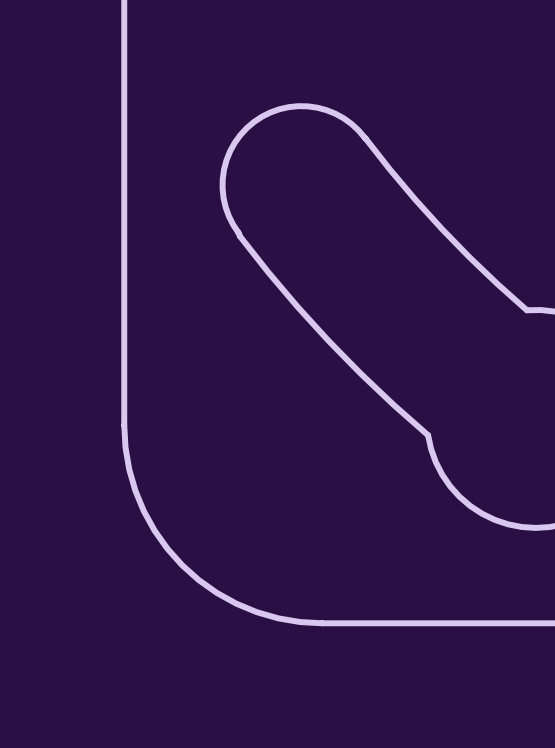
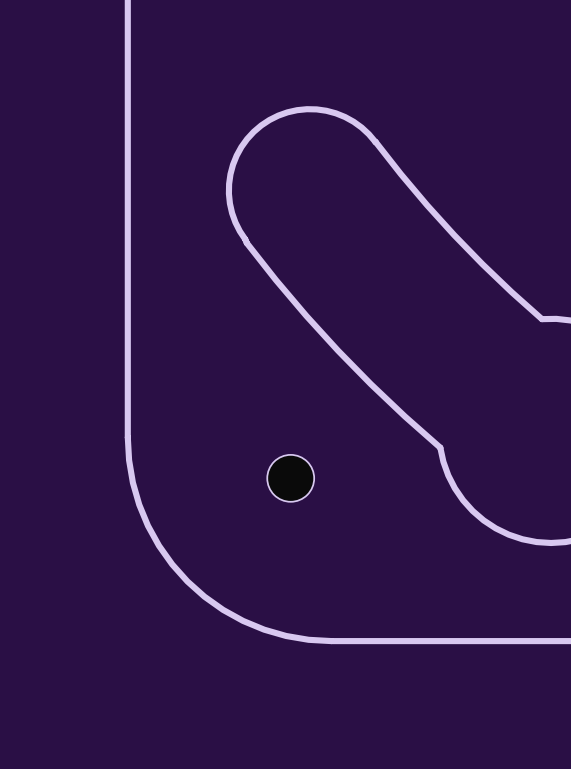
part: none -> (290, 478)

